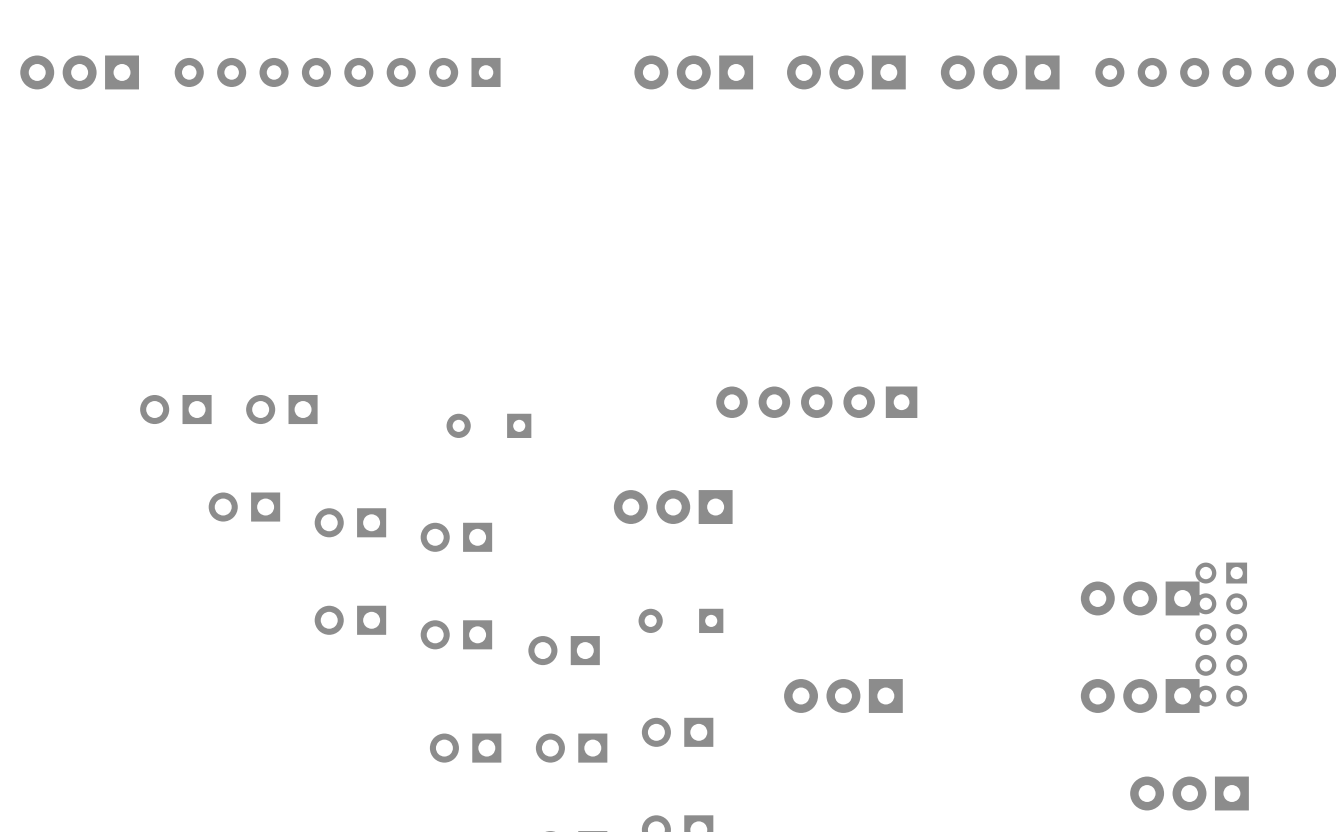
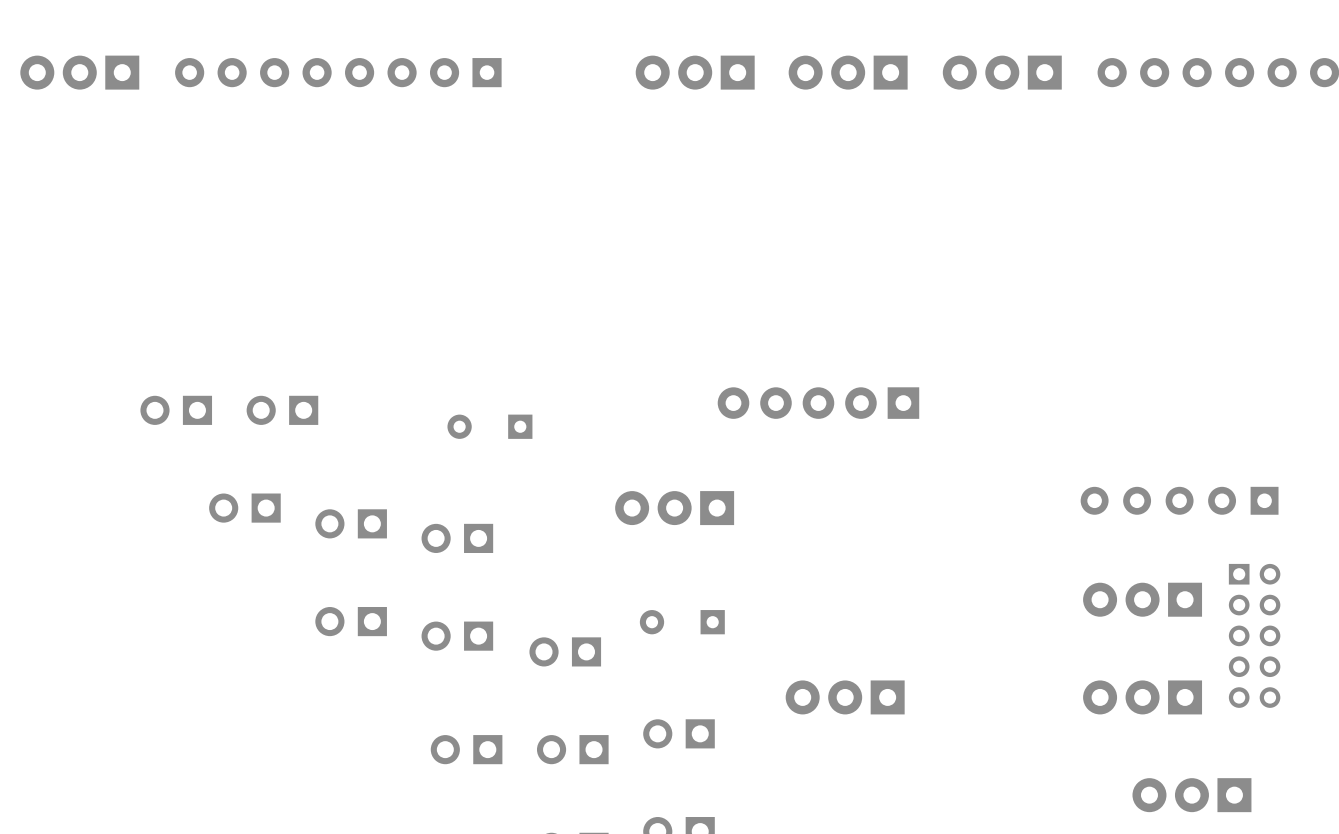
part: none -> (1179, 500)
part: (1221, 634) -> none
part: none -> (1254, 635)

